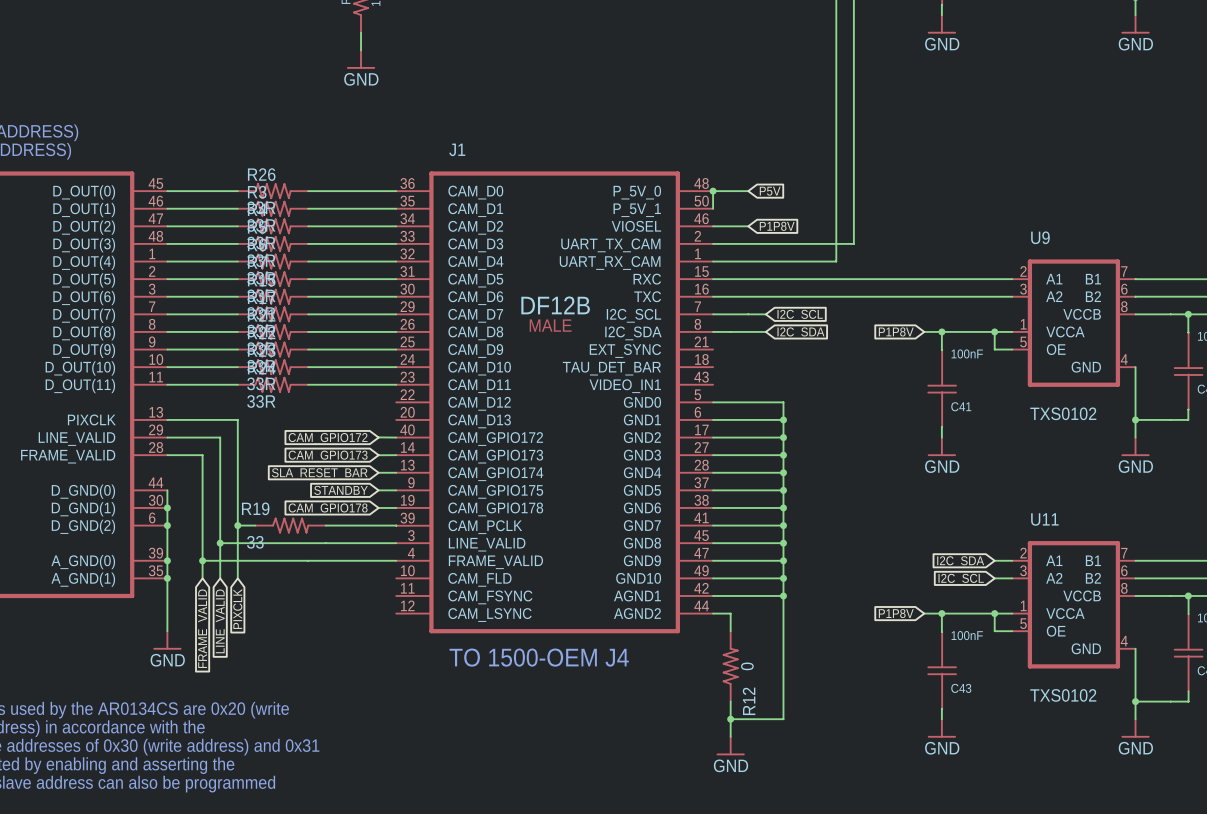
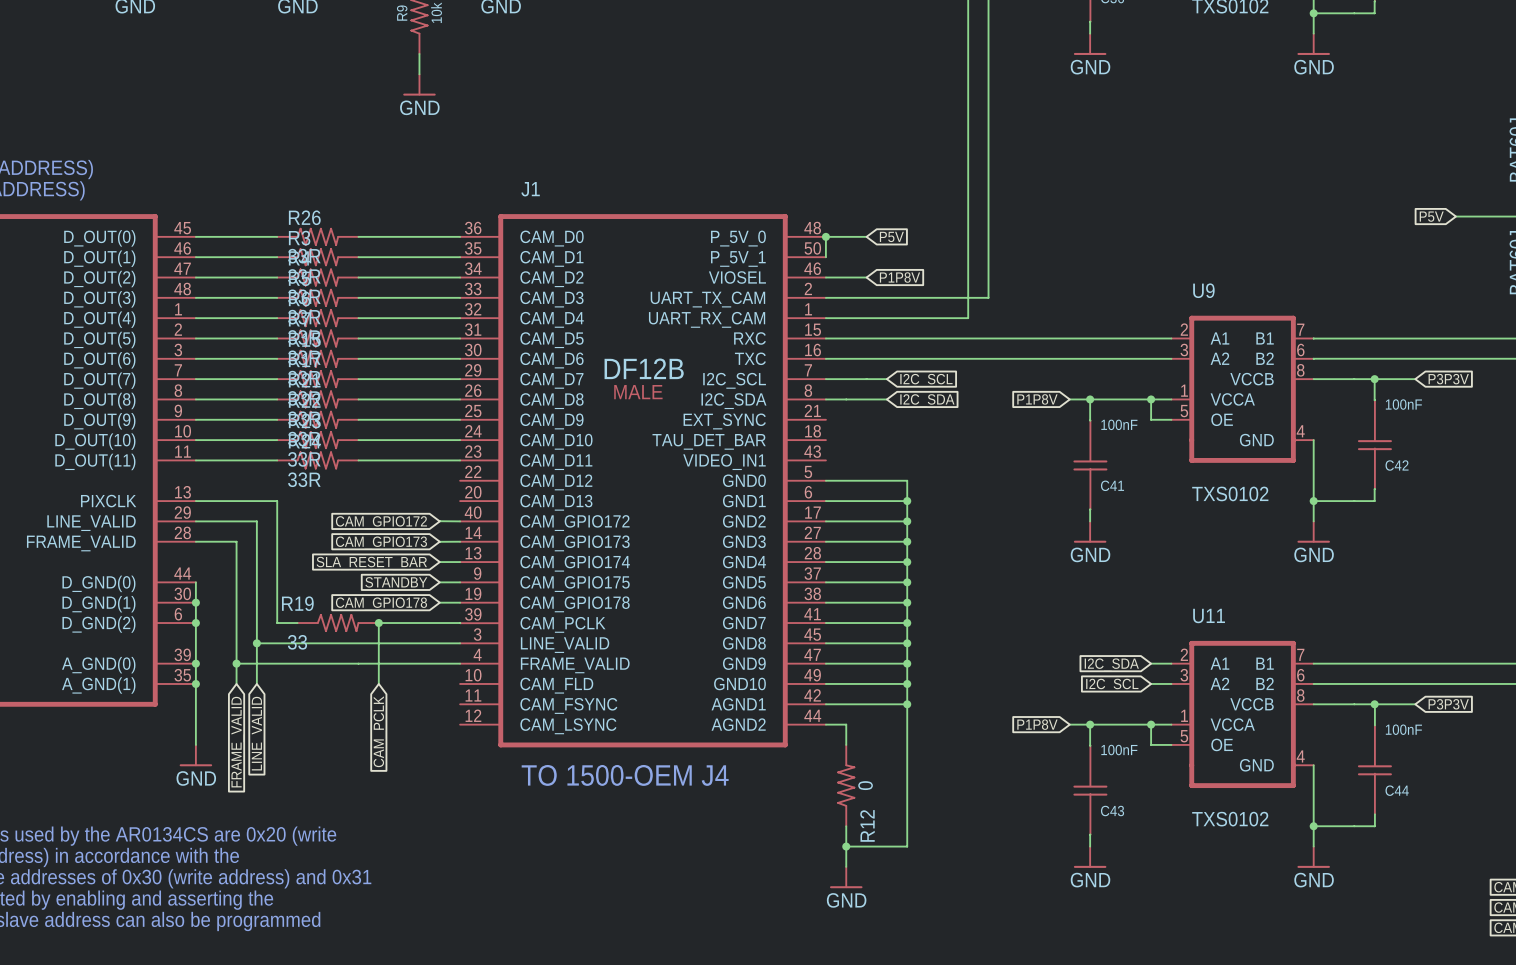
wire: (237, 525) (237, 578) -> (378, 623) (378, 683)
junction: (237, 525) -> none
junction: none -> (378, 623)
global label: PIXCLK (237, 609) -> none
global label: none -> CAM_PCLK (380, 731)

